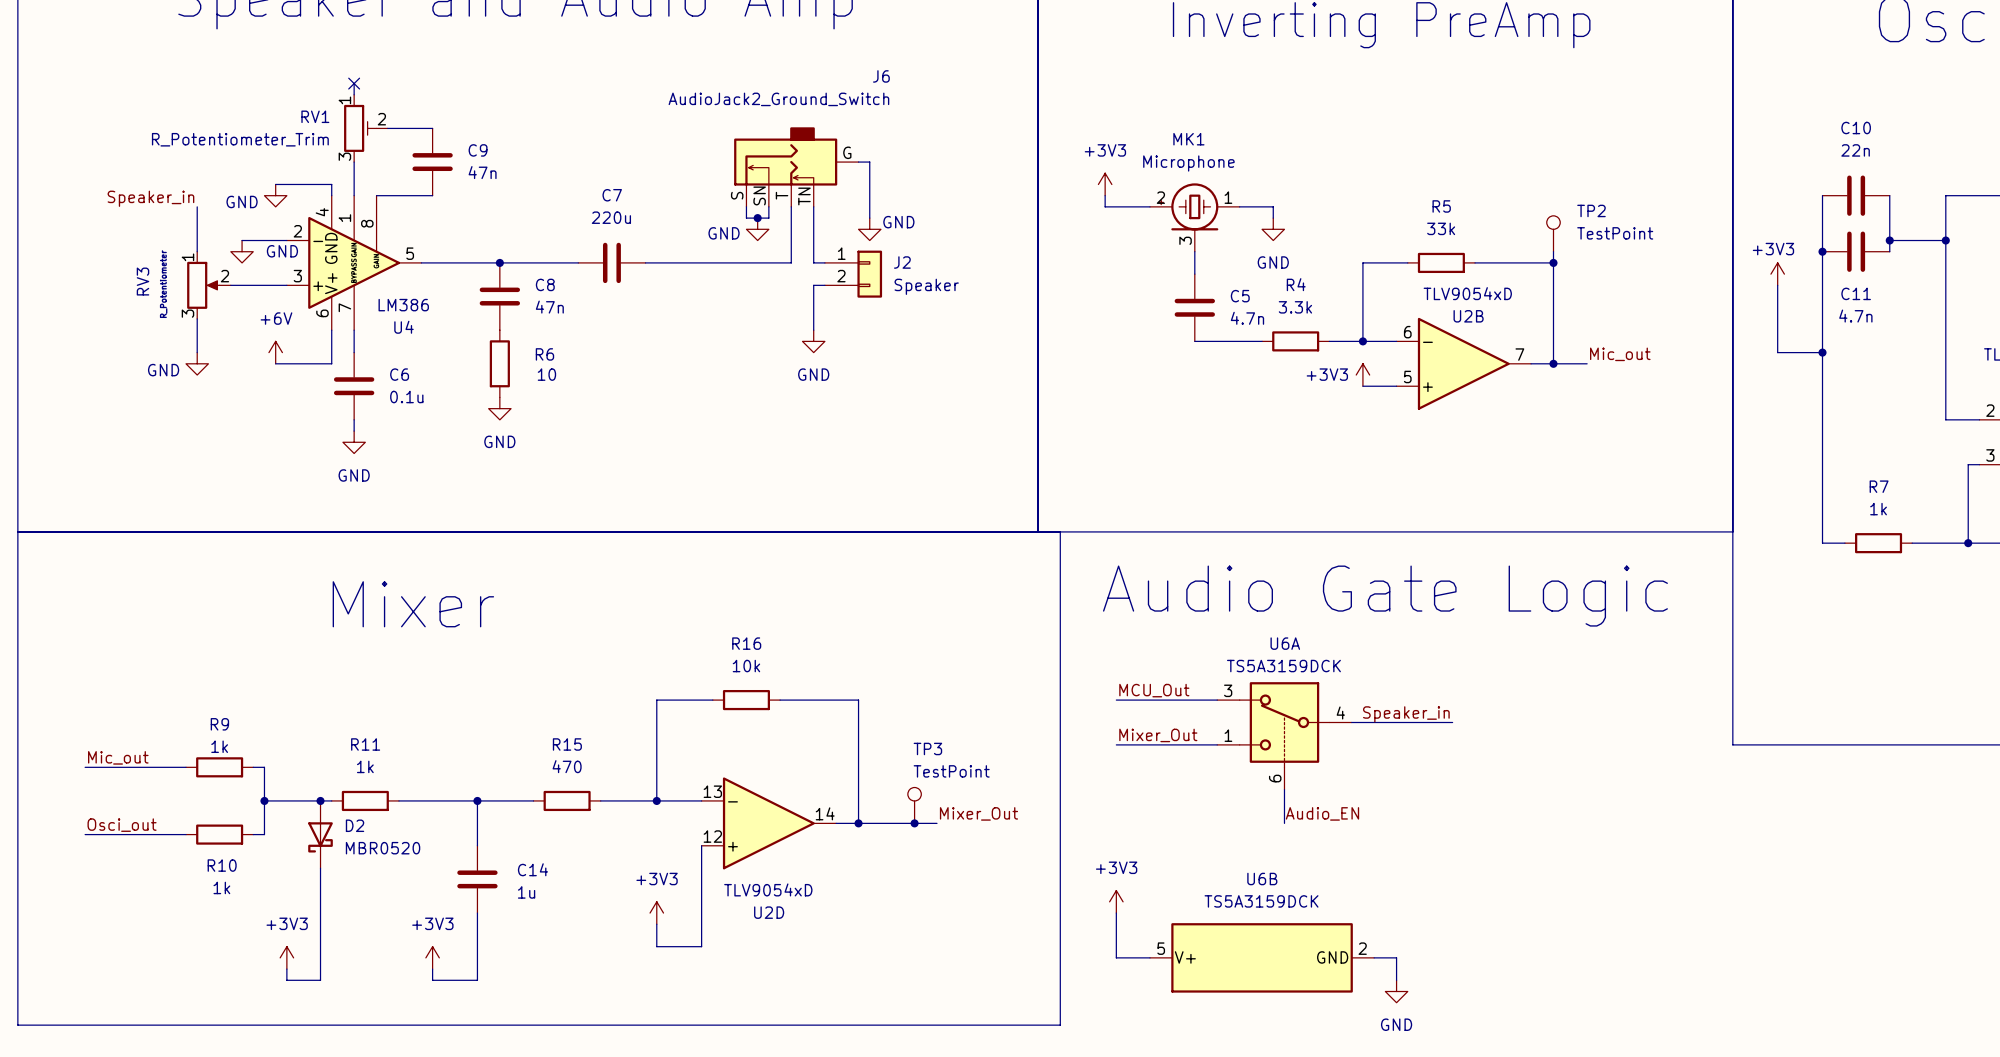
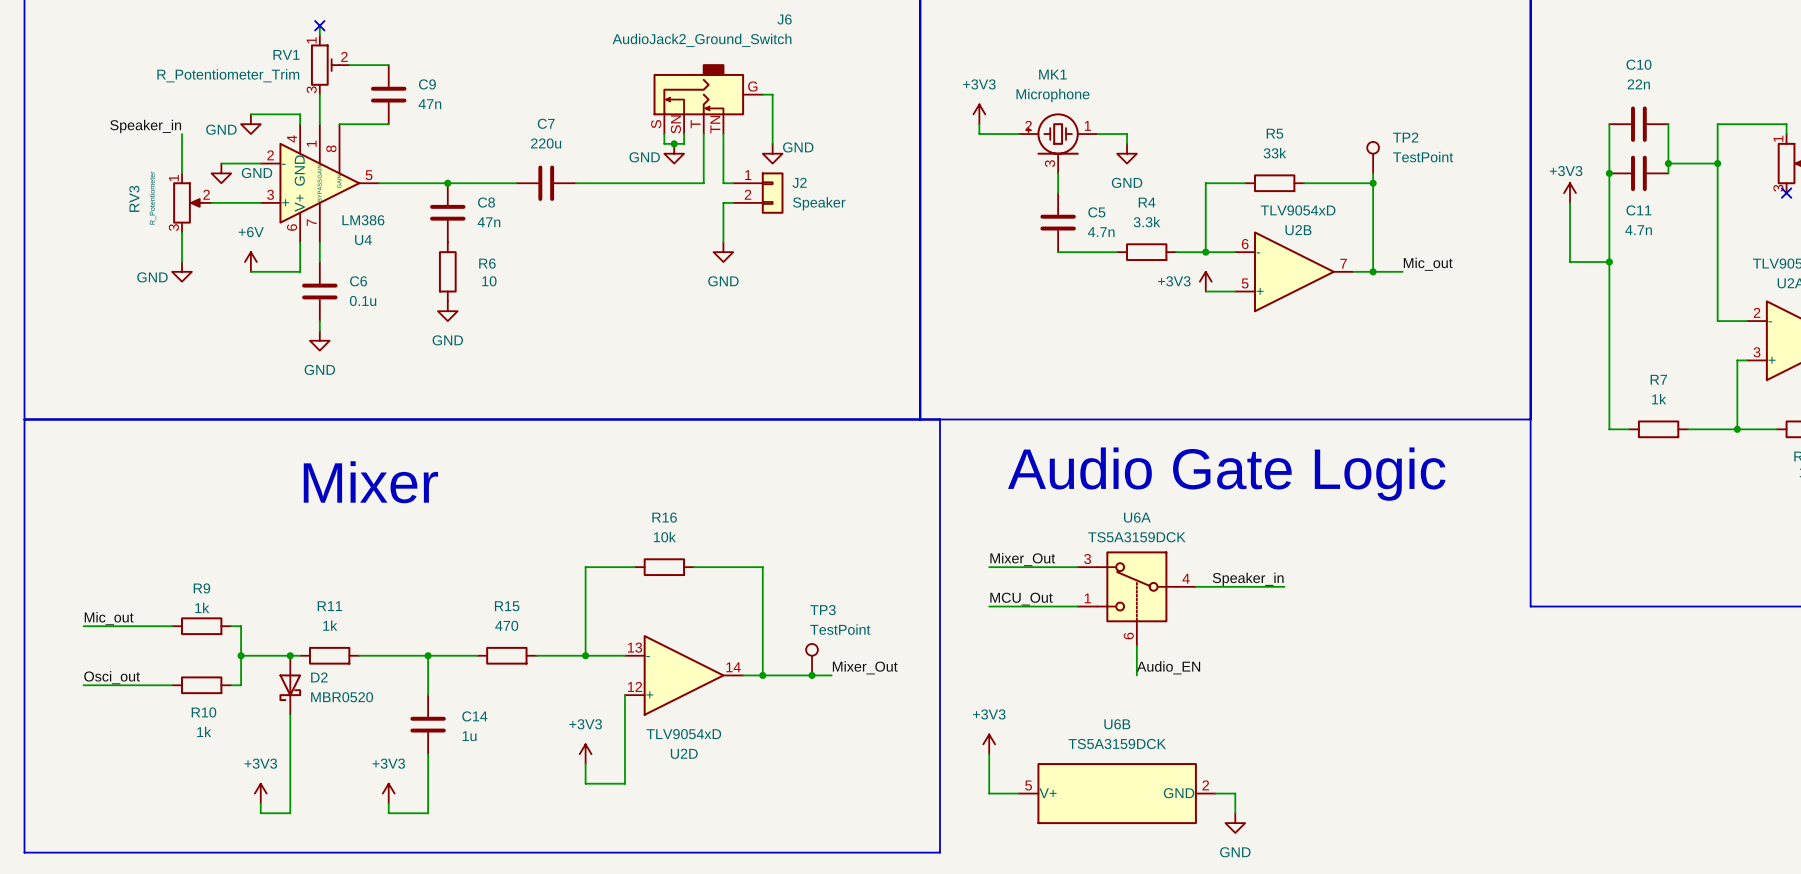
label: MCU_Out (1154, 690) -> Mixer_Out (1022, 559)
label: Mixer_Out (1158, 735) -> MCU_Out (1021, 599)

